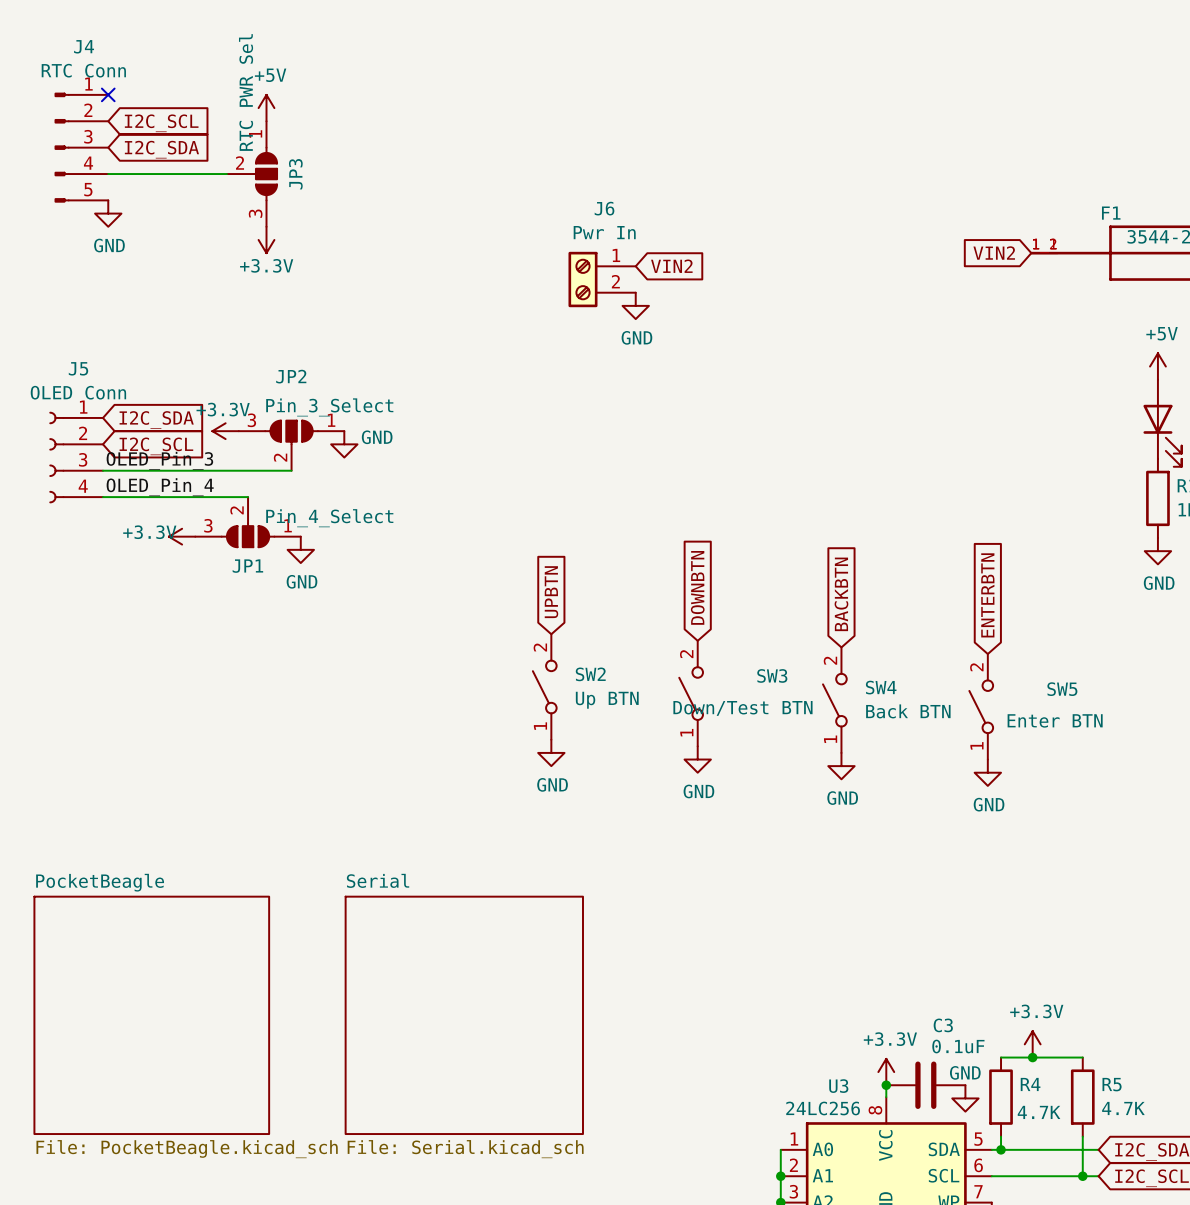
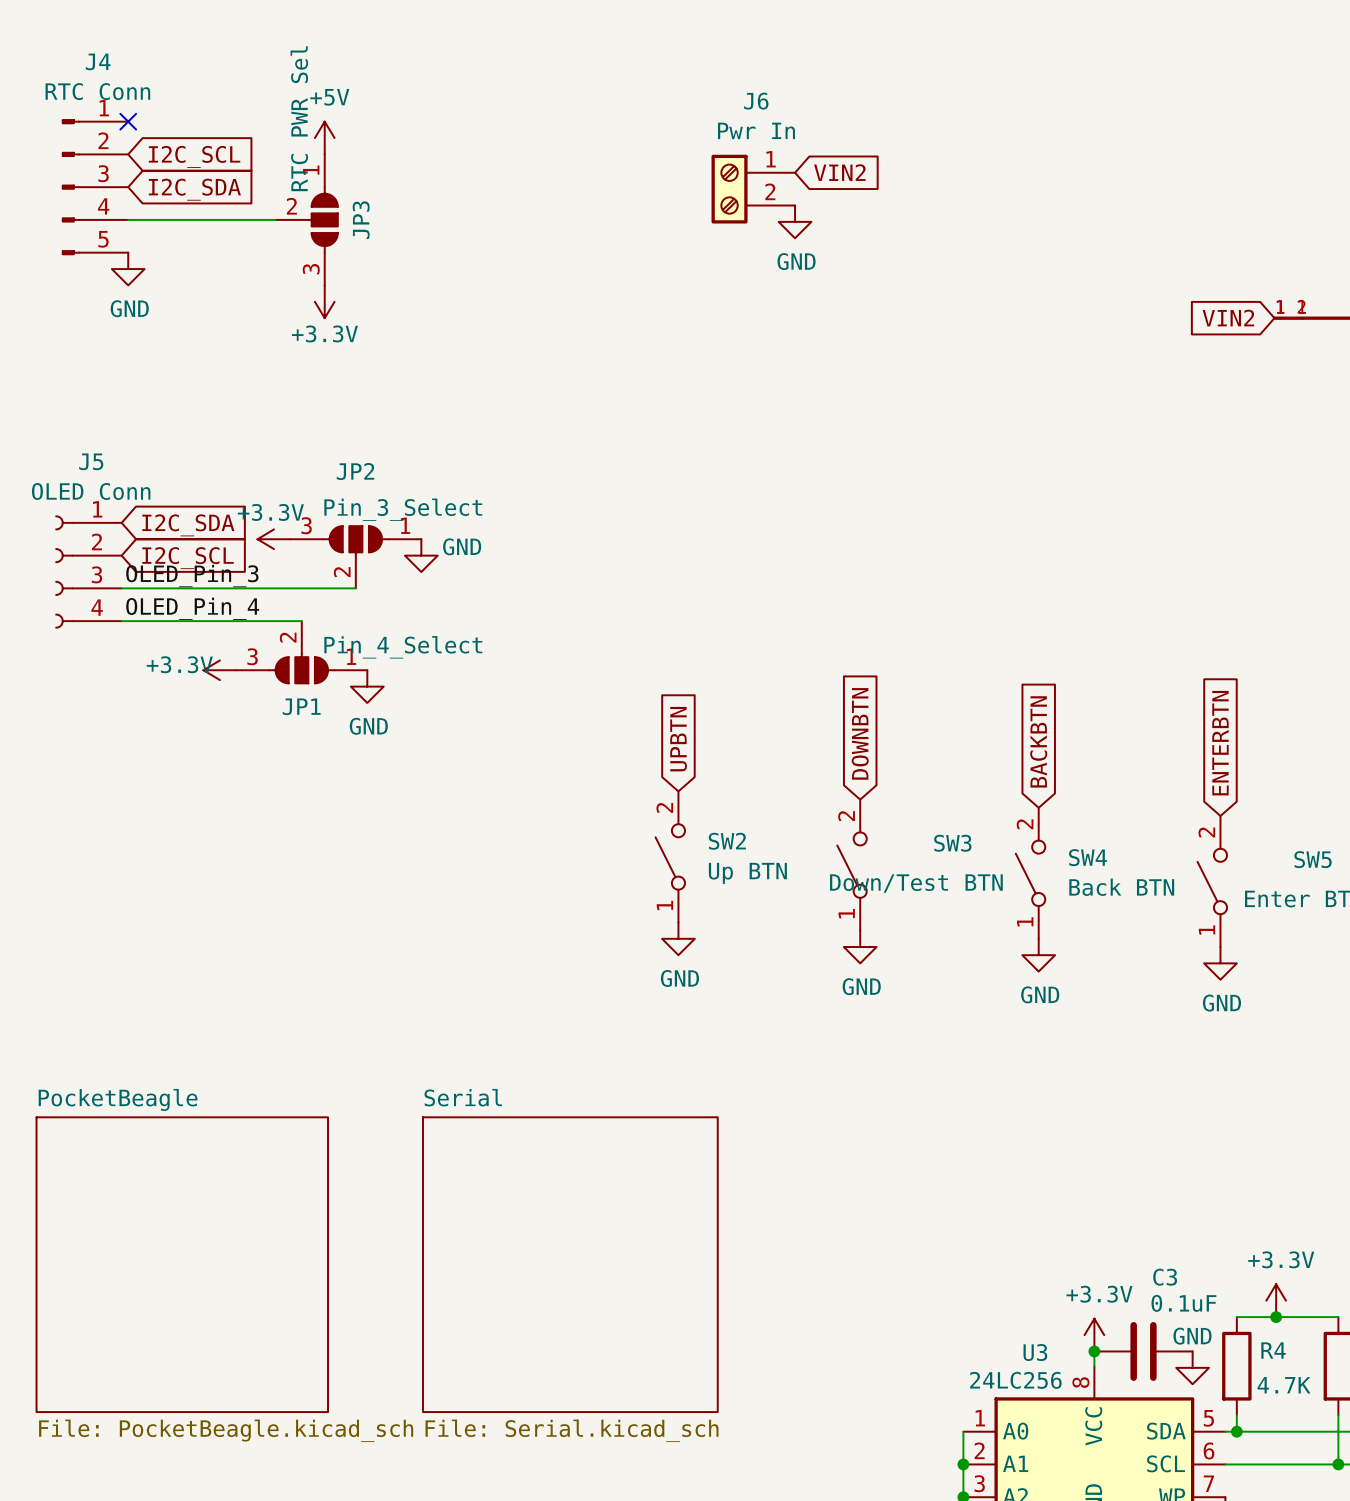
global label position: VIN2 (671, 266) -> VIN2 (839, 172)
J6 position: (602, 279) -> (753, 189)
power symbol position: GND (635, 305) -> GND (795, 221)

